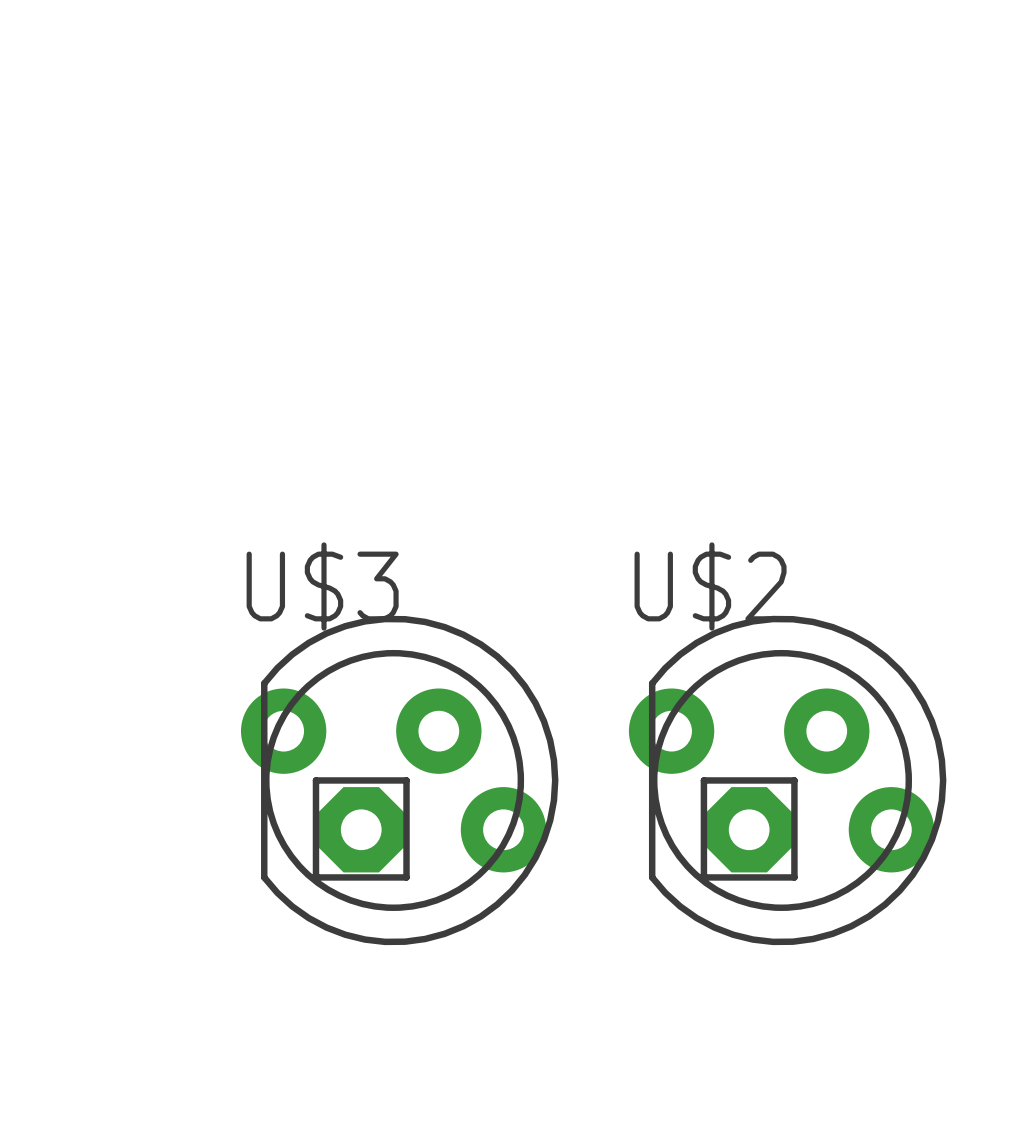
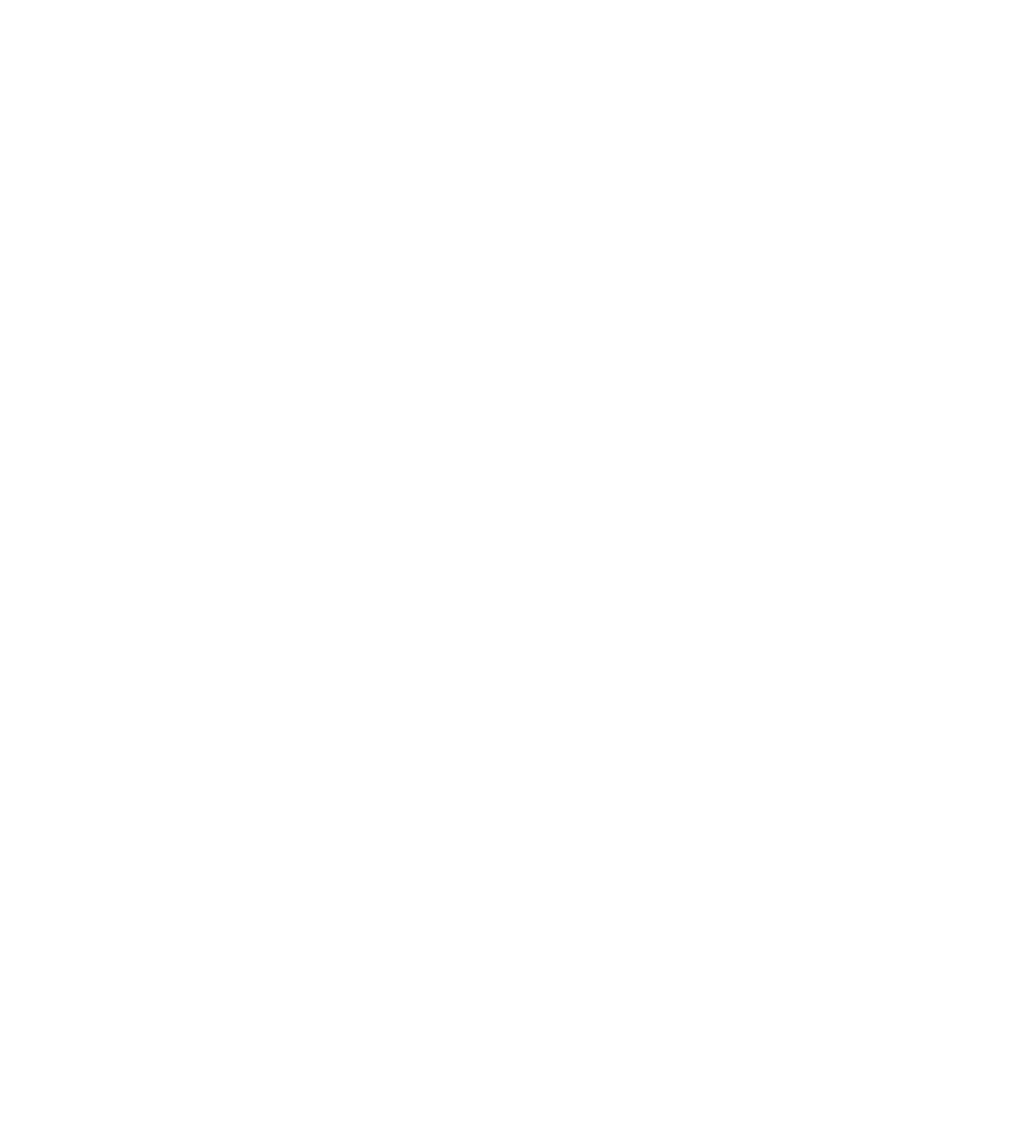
U$3: (399, 780) -> none
U$2: (787, 780) -> none

